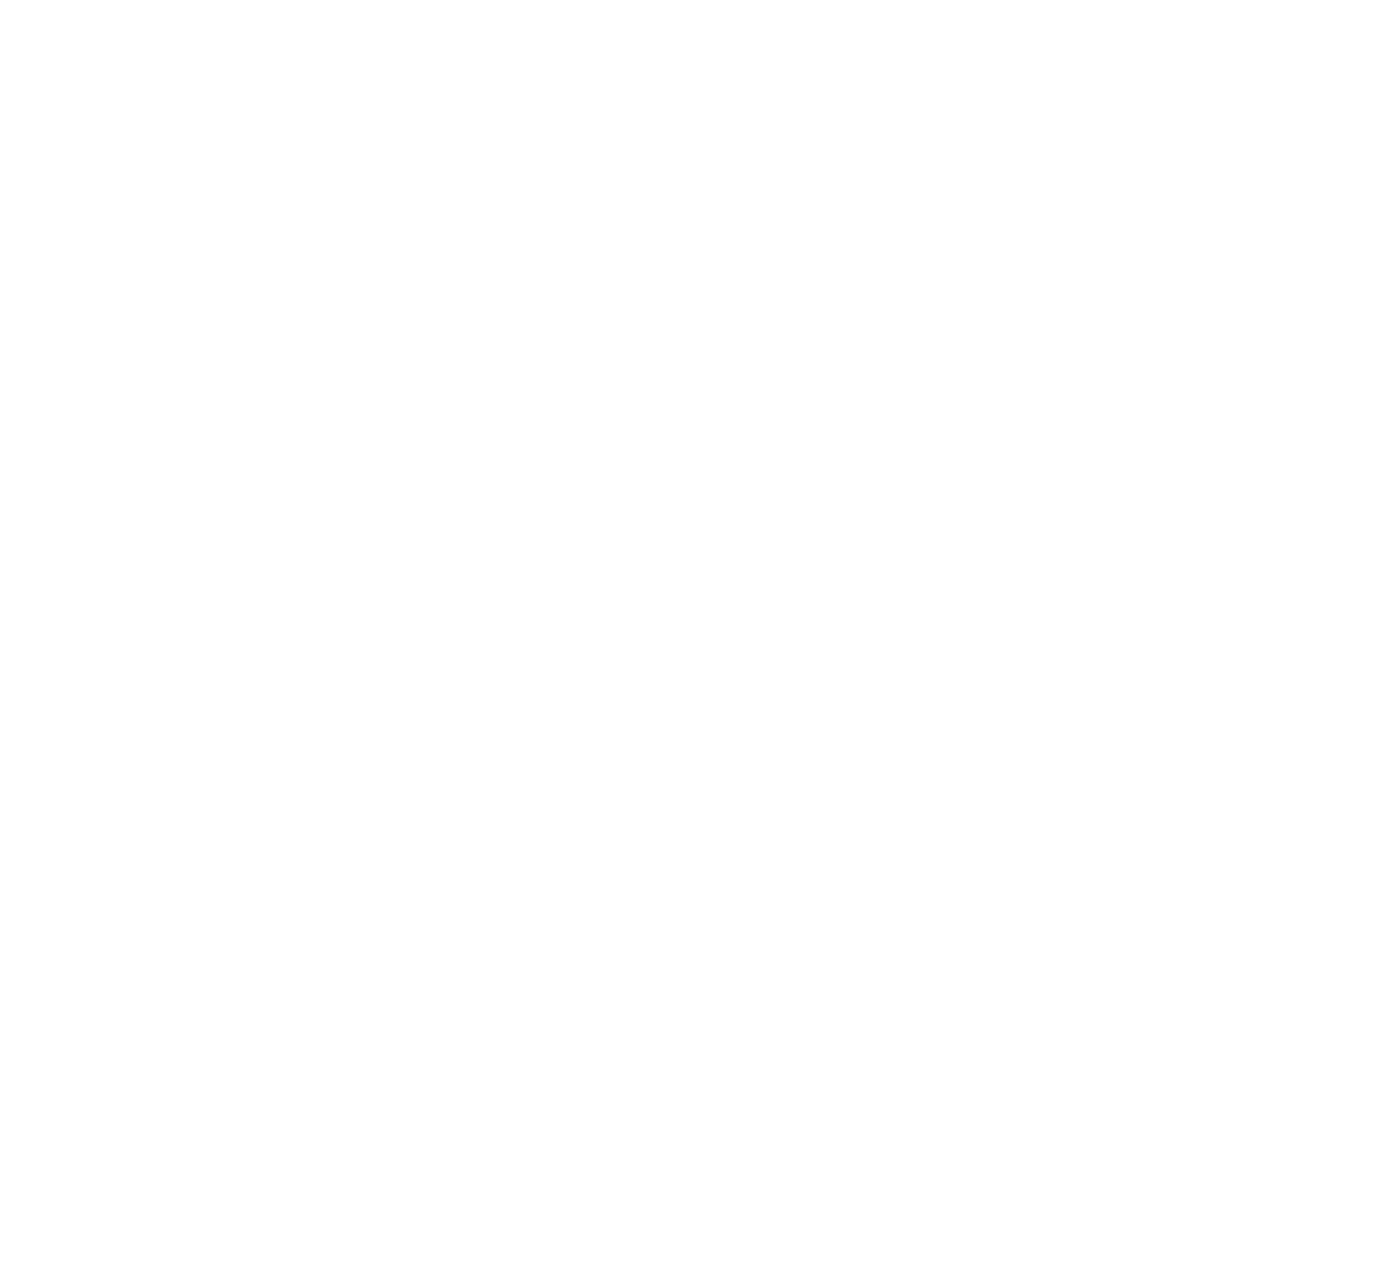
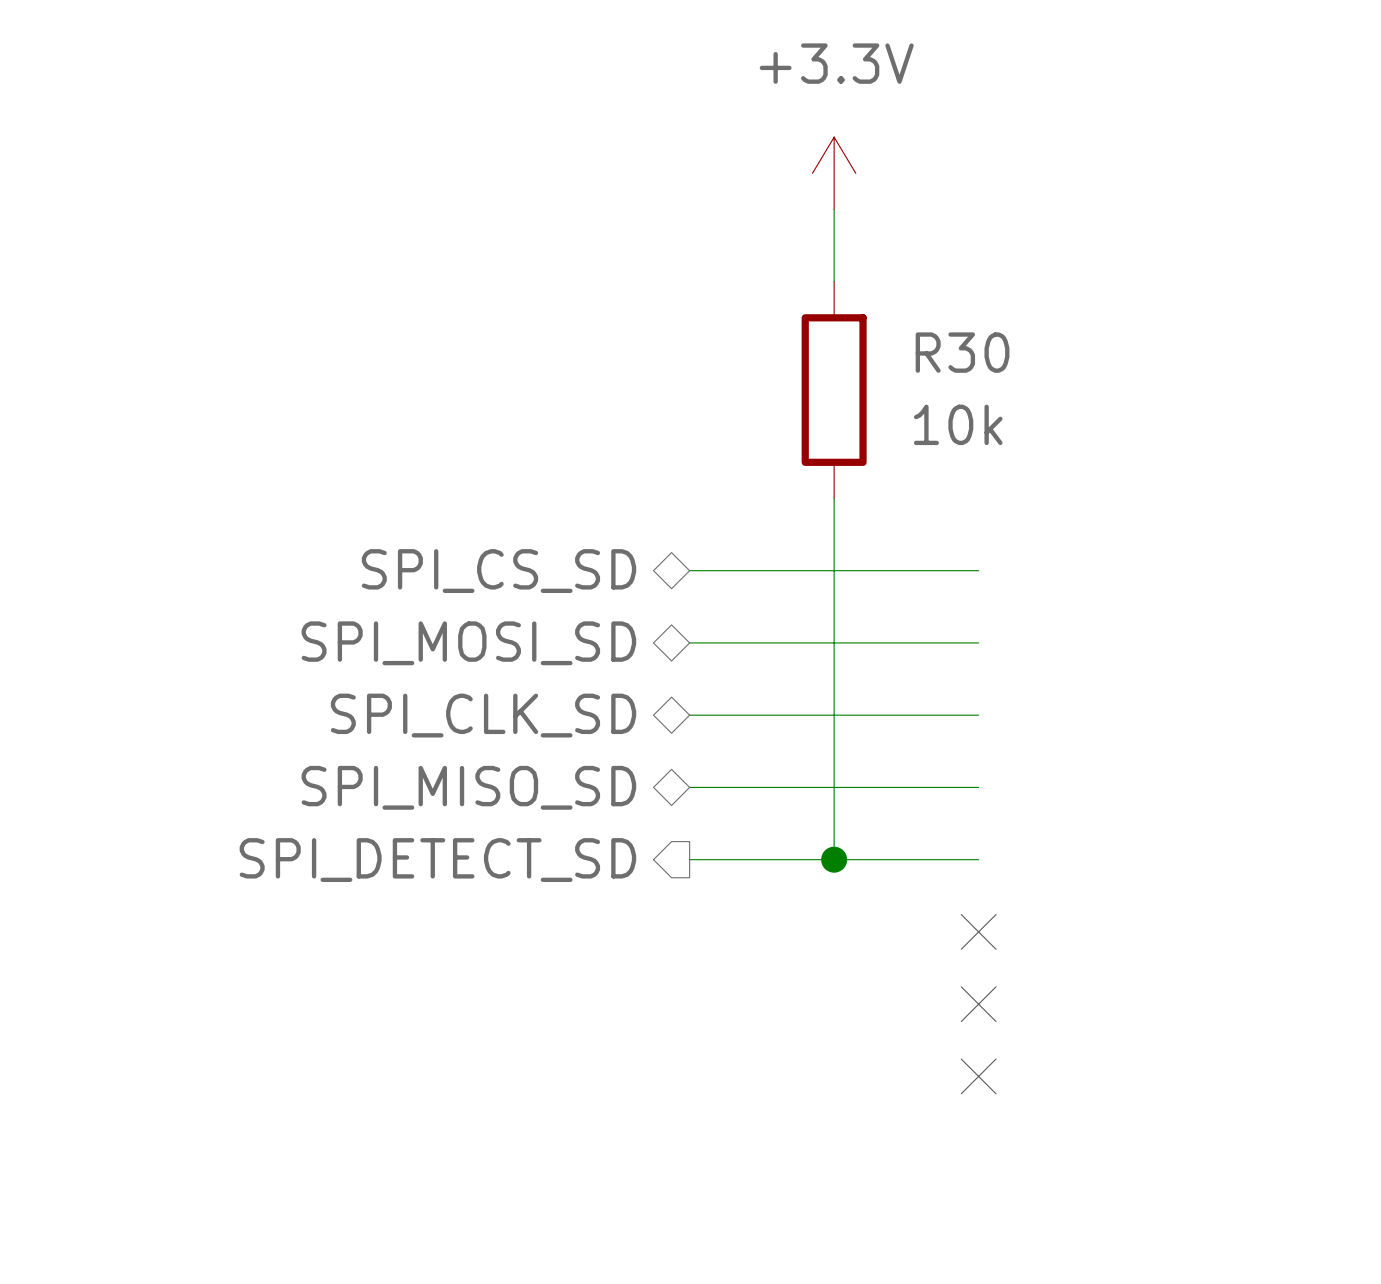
power symbol: none -> +3.3V (834, 173)
wire: none -> (834, 209) (834, 281)
R30: none -> 10k (834, 390)
wire: none -> (834, 498) (834, 859)
wire: none -> (689, 570) (978, 570)
hierarchical label: none -> SPI_CS_SD (498, 571)
wire: none -> (689, 642) (978, 642)
hierarchical label: none -> SPI_MOSI_SD (468, 643)
hierarchical label: none -> SPI_CLK_SD (483, 715)
wire: none -> (689, 715) (978, 715)
hierarchical label: none -> SPI_MISO_SD (468, 787)
wire: none -> (689, 787) (978, 787)
wire: none -> (689, 859) (978, 859)
junction: none -> (834, 859)
hierarchical label: none -> SPI_DETECT_SD (437, 860)
no-connect mark: none -> (978, 931)
no-connect mark: none -> (978, 1004)
no-connect mark: none -> (978, 1076)

